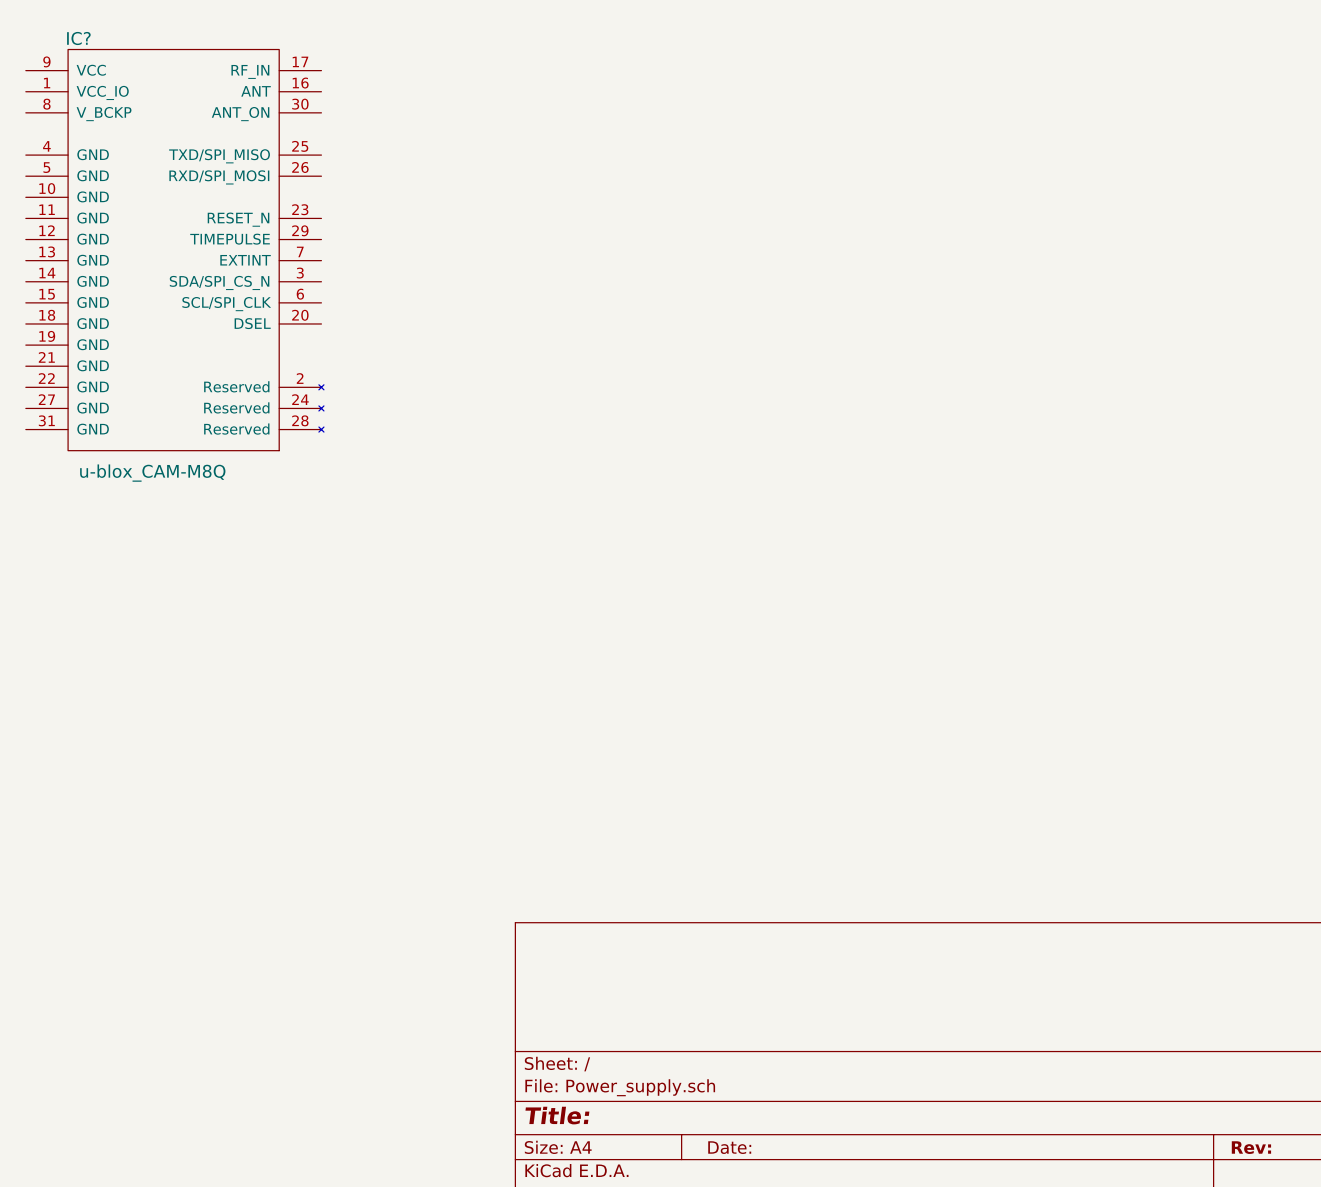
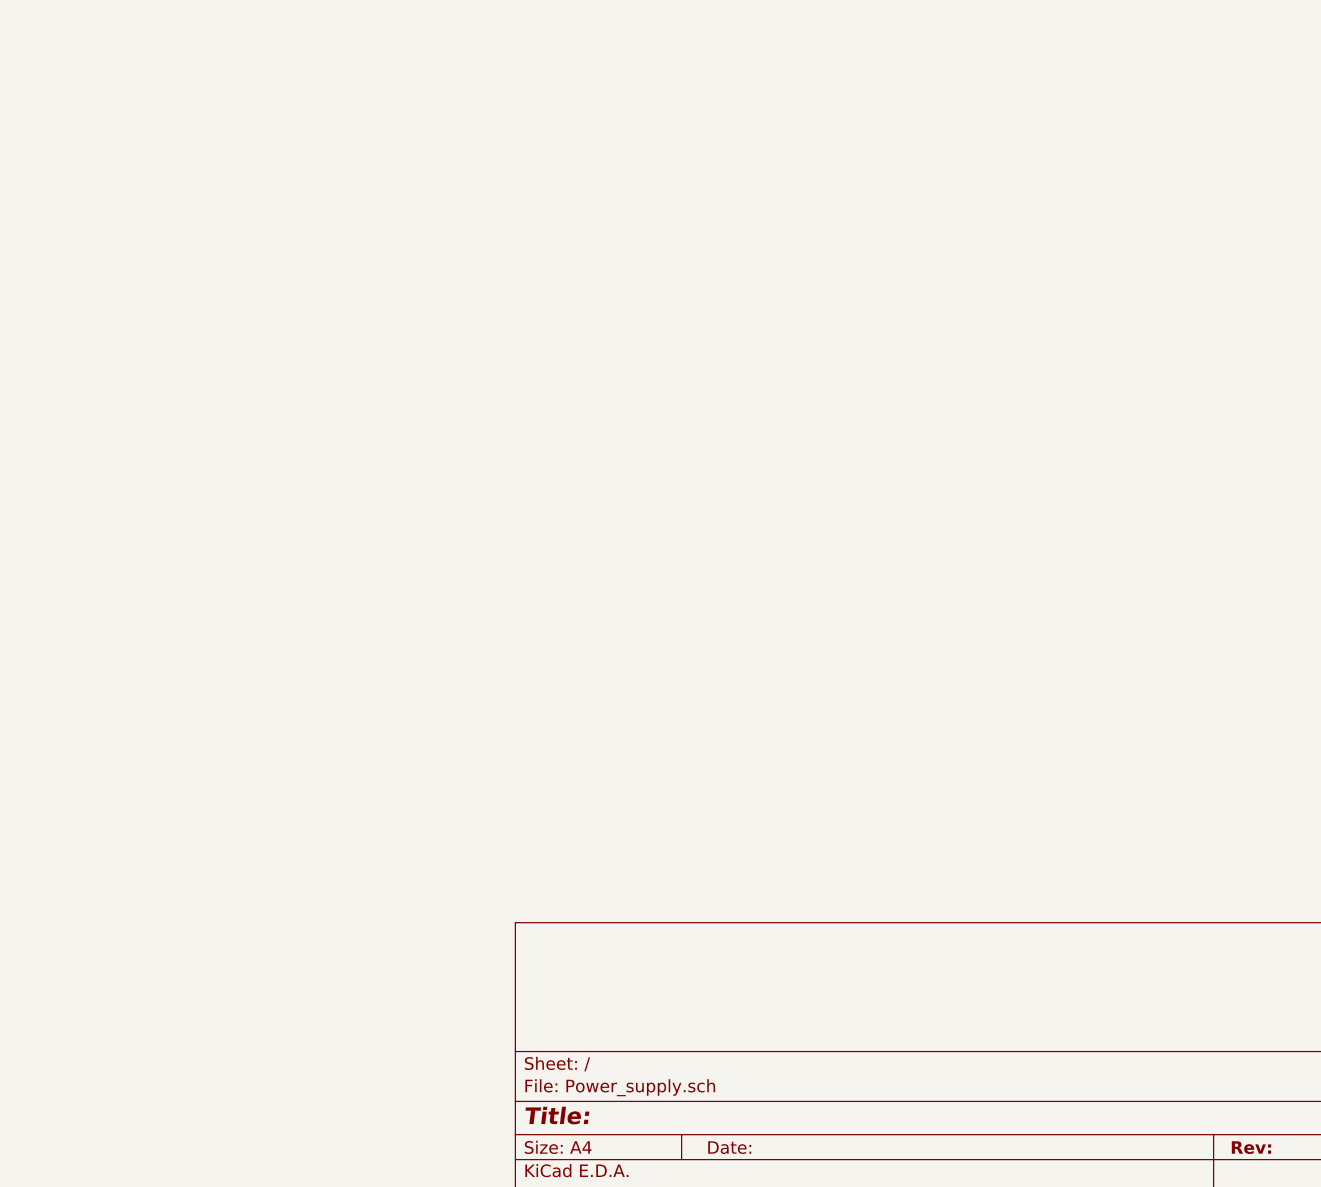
IC?: u-blox_CAM-M8Q (174, 250) -> none

